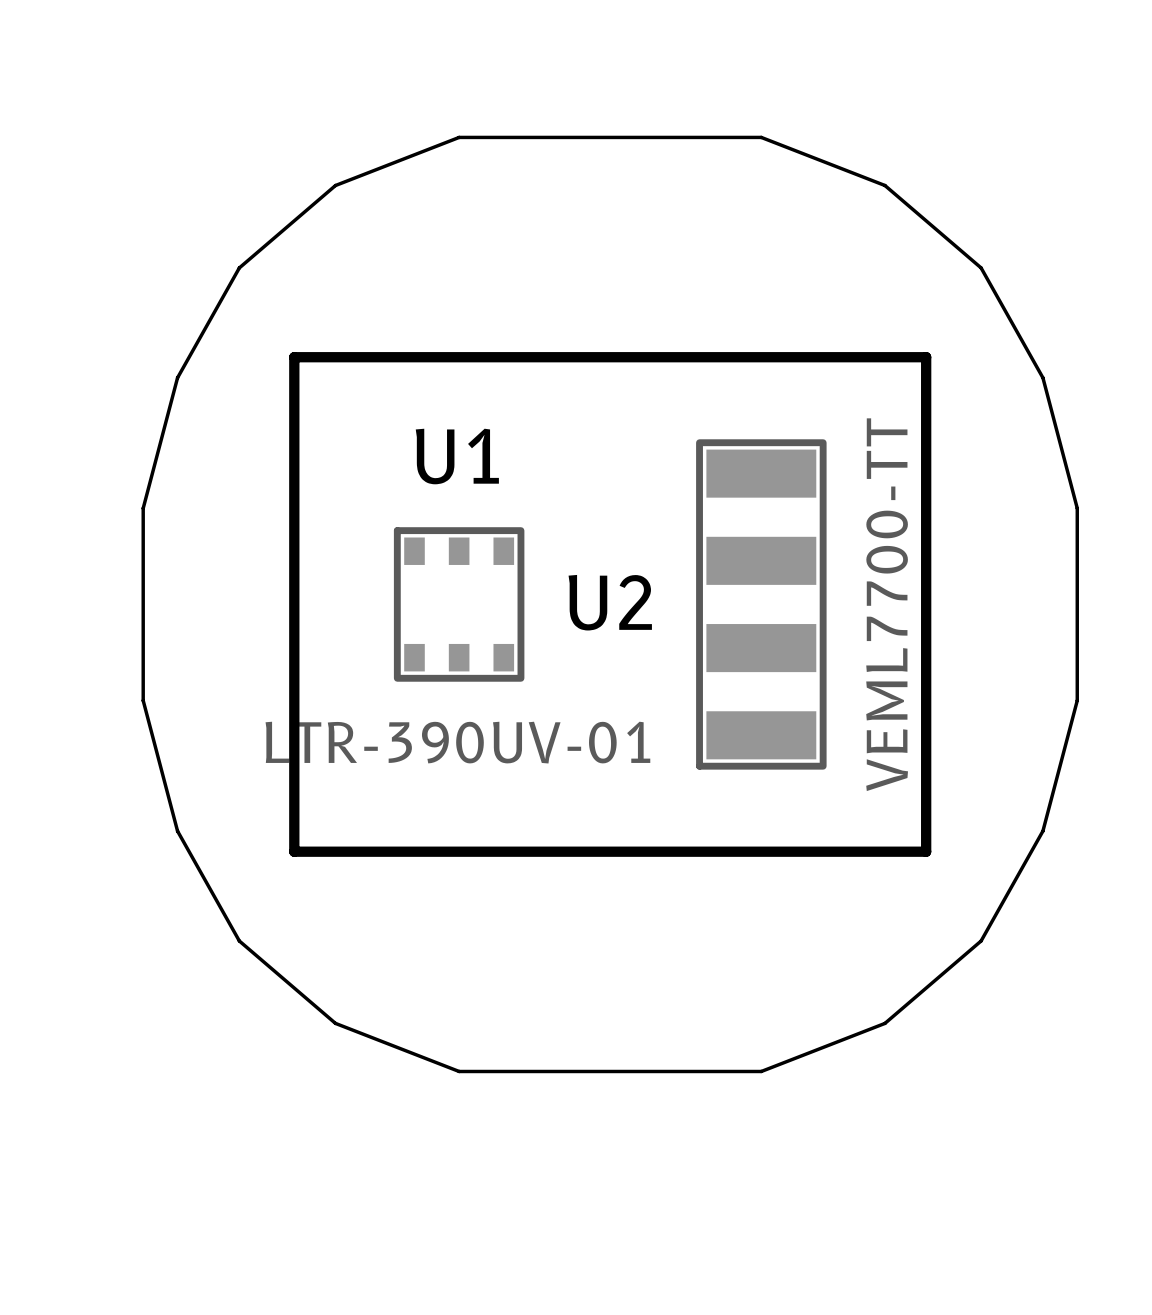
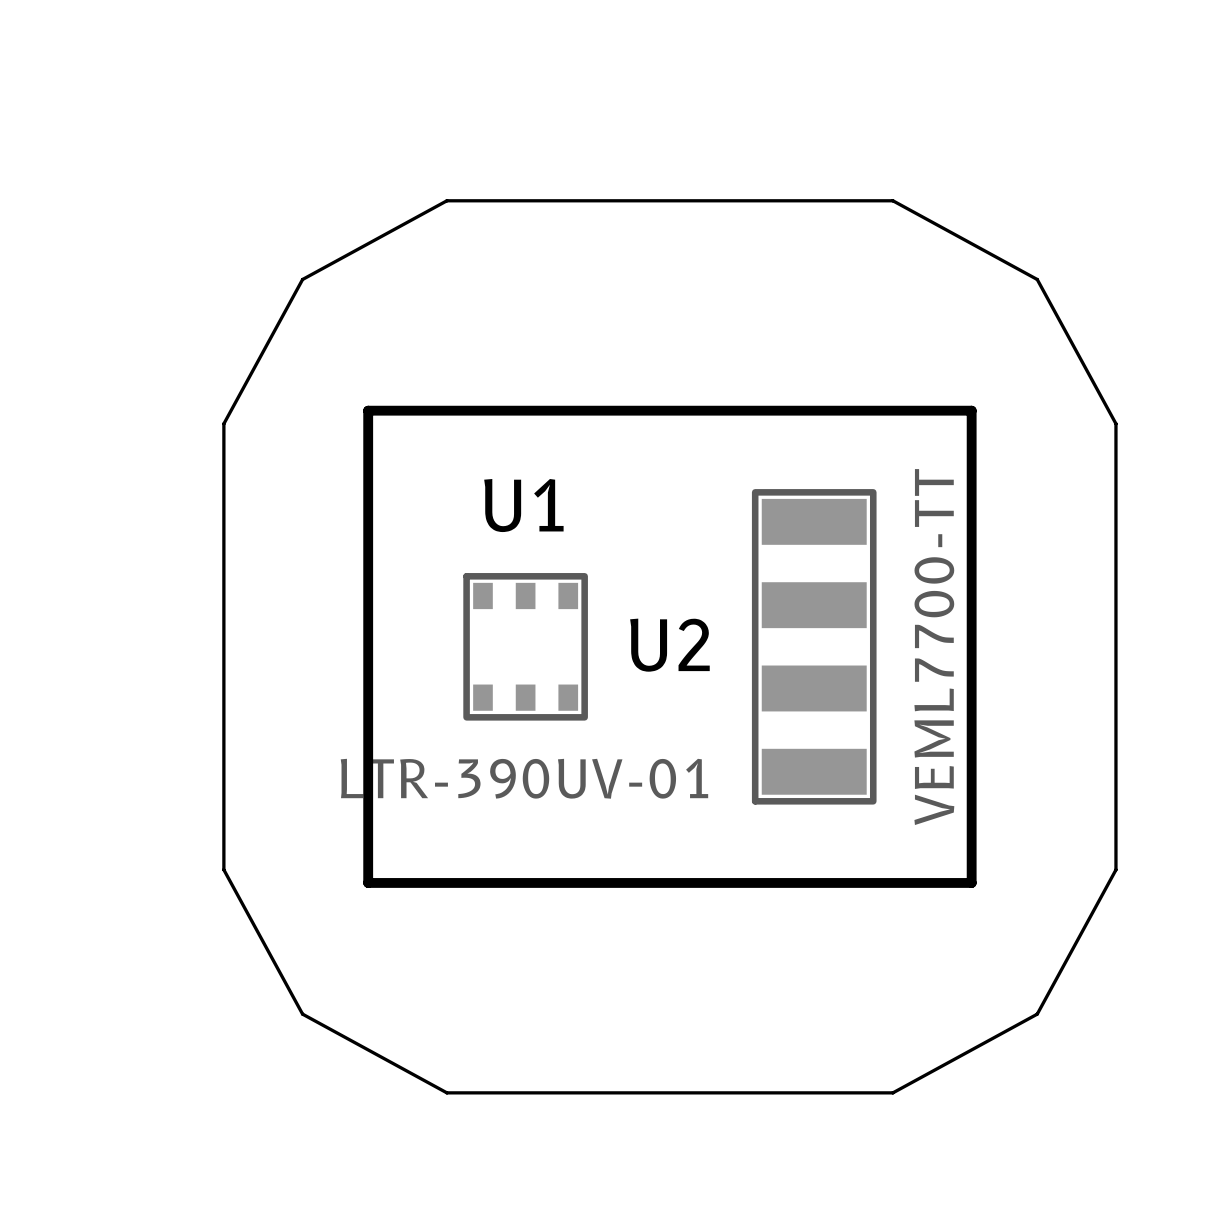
board edge: (459, 137) (335, 185) (239, 267) (177, 377) (143, 508) -> (525, 200) (446, 200) (302, 279) (223, 423) (223, 554)
board edge: (761, 137) (884, 185) (981, 267) (1042, 377) (1077, 508) -> (814, 200) (892, 200) (1037, 279) (1115, 423) (1115, 554)
board edge: (143, 700) (177, 831) (239, 940) (335, 1023) (459, 1071) -> (223, 738) (223, 869) (302, 1014) (446, 1092) (525, 1092)
board edge: (1077, 700) (1042, 831) (981, 940) (884, 1023) (761, 1071) -> (1115, 738) (1115, 869) (1037, 1014) (892, 1092) (814, 1092)

